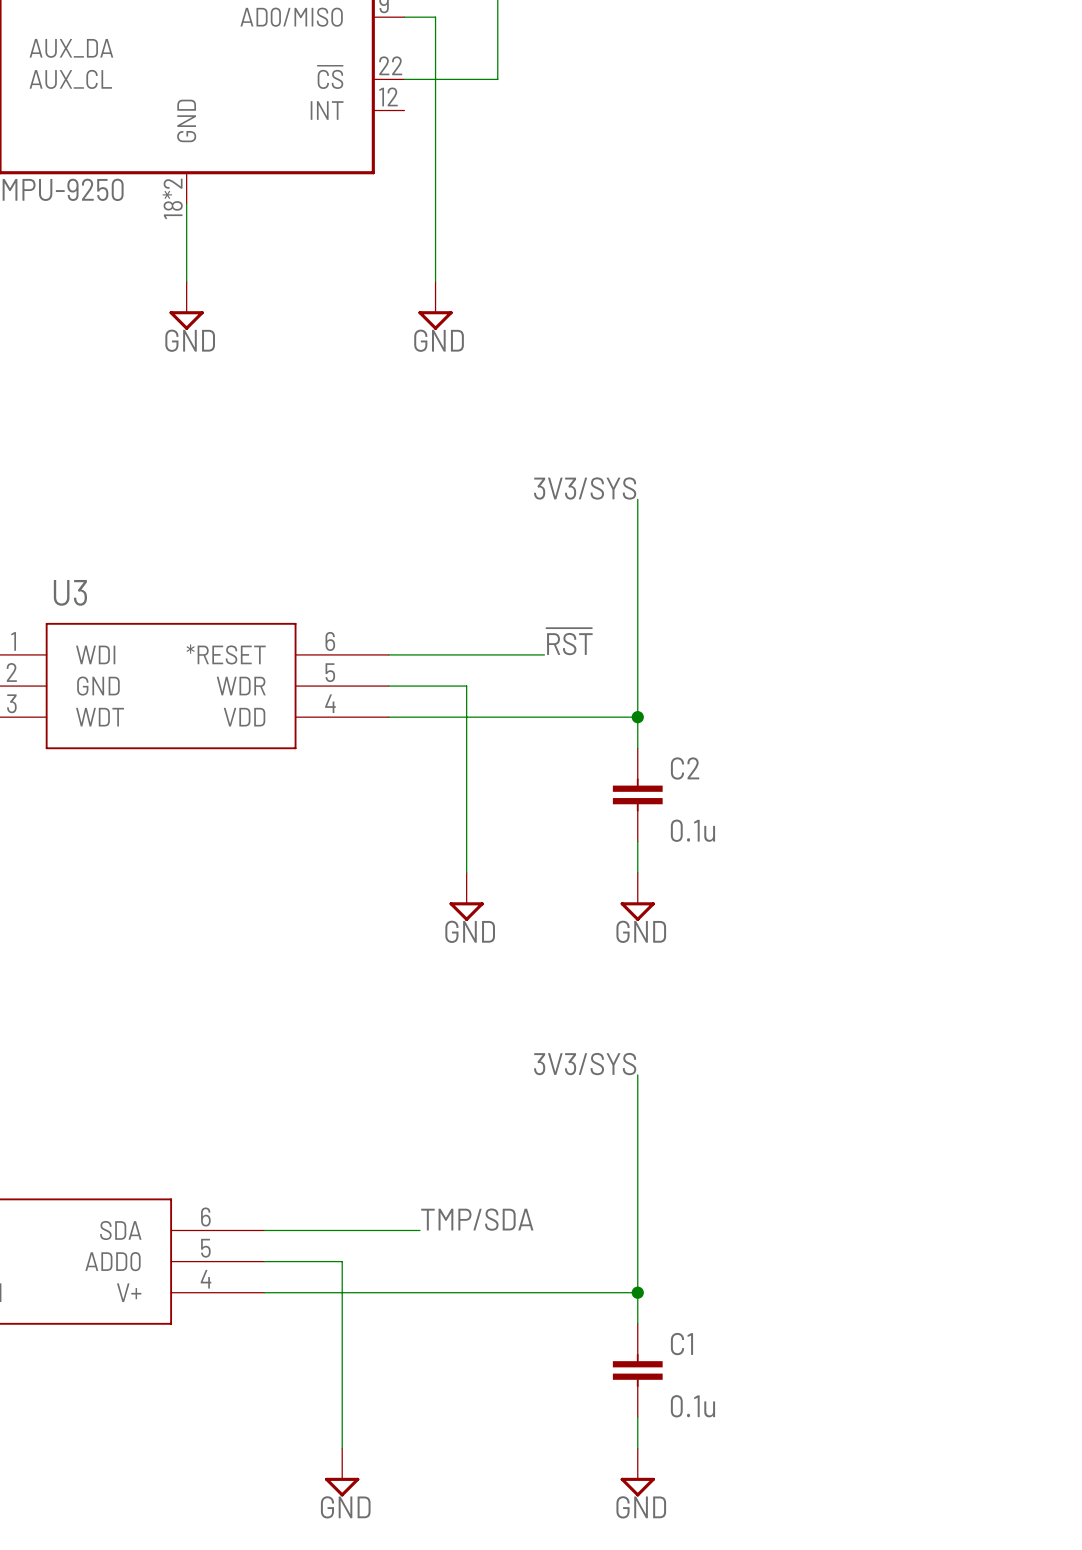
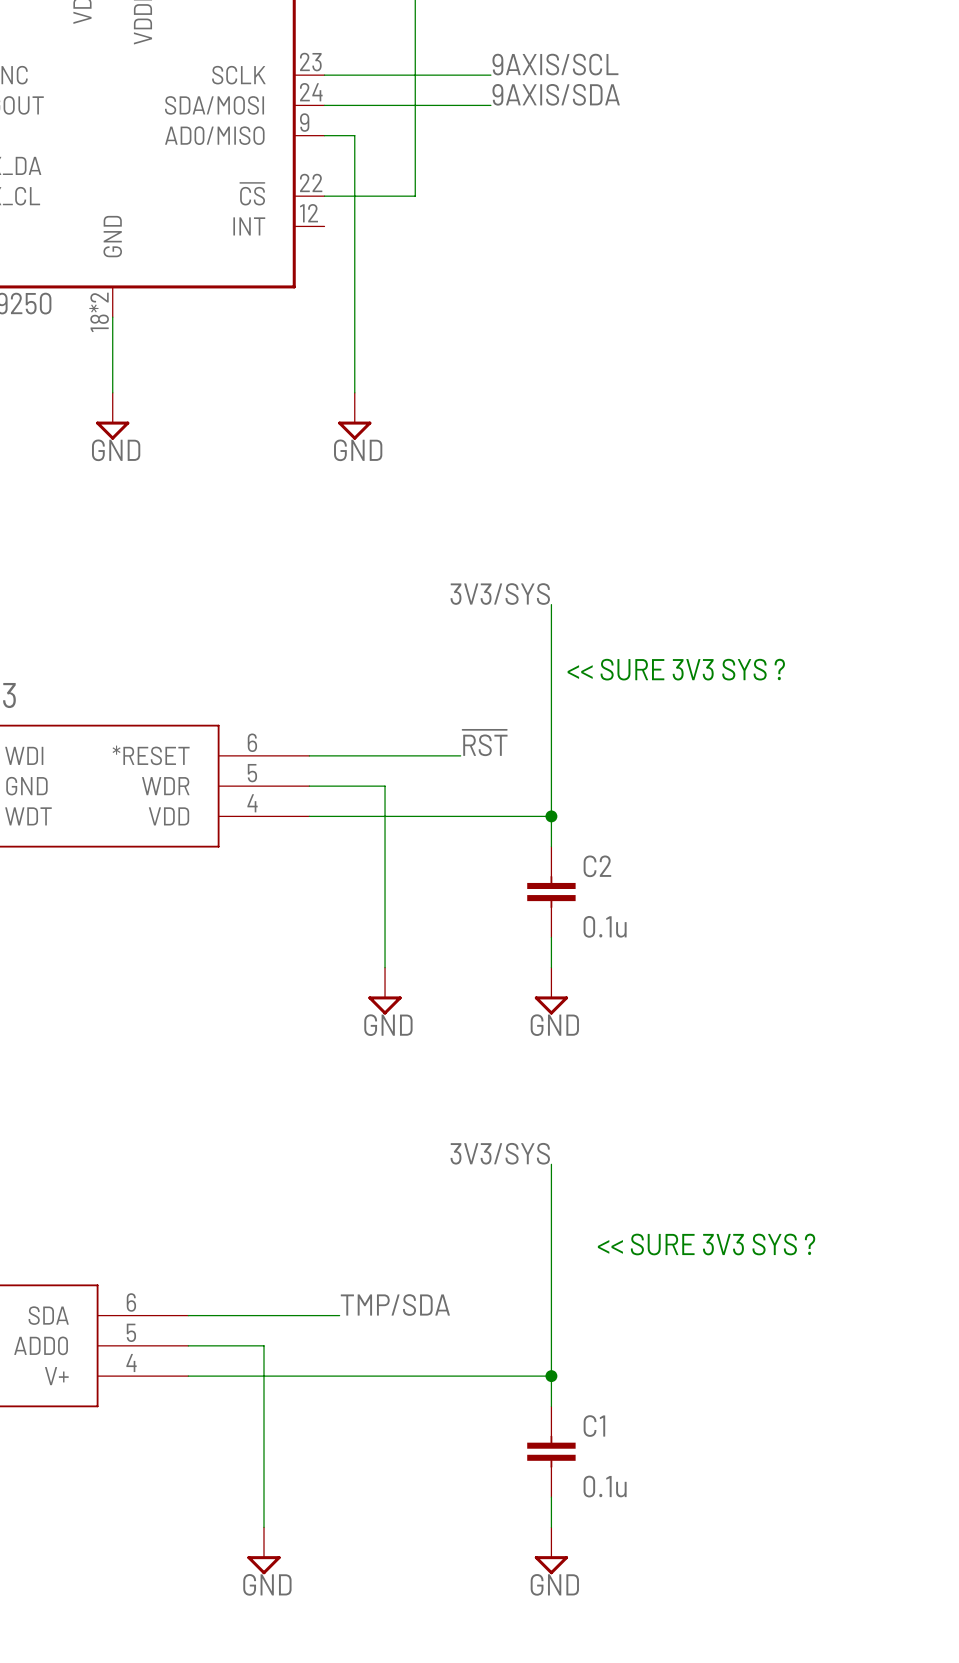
text: none -> << SURE 3V3 SYS ? (676, 669)
text: none -> << SURE 3V3 SYS ? (706, 1244)

